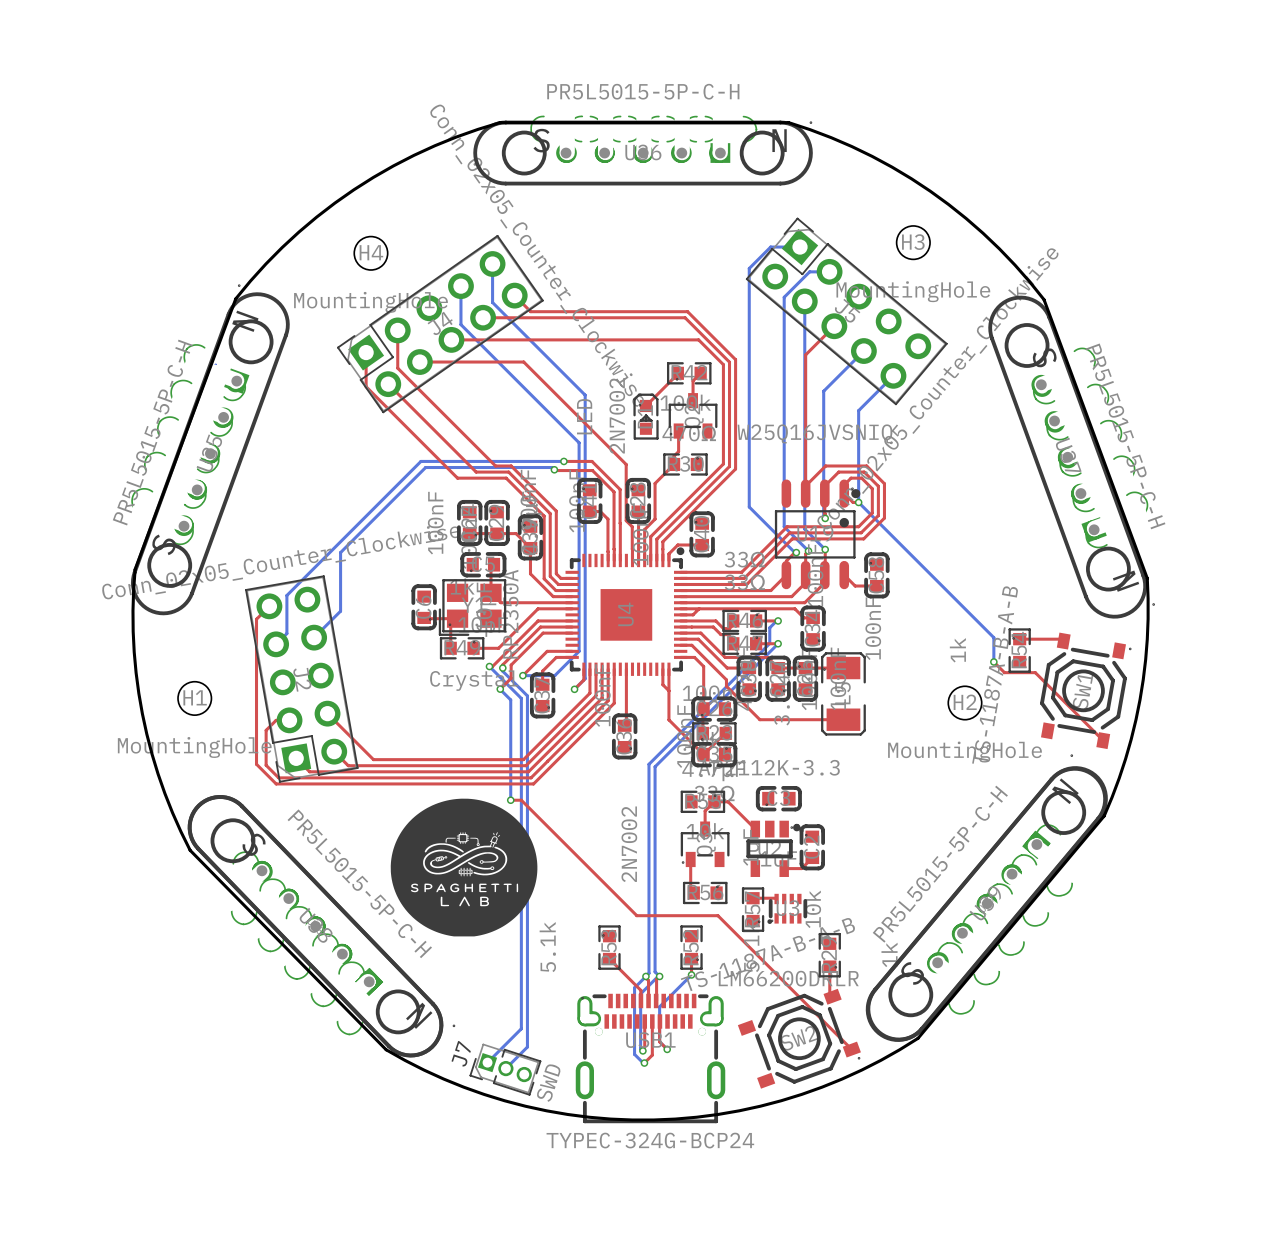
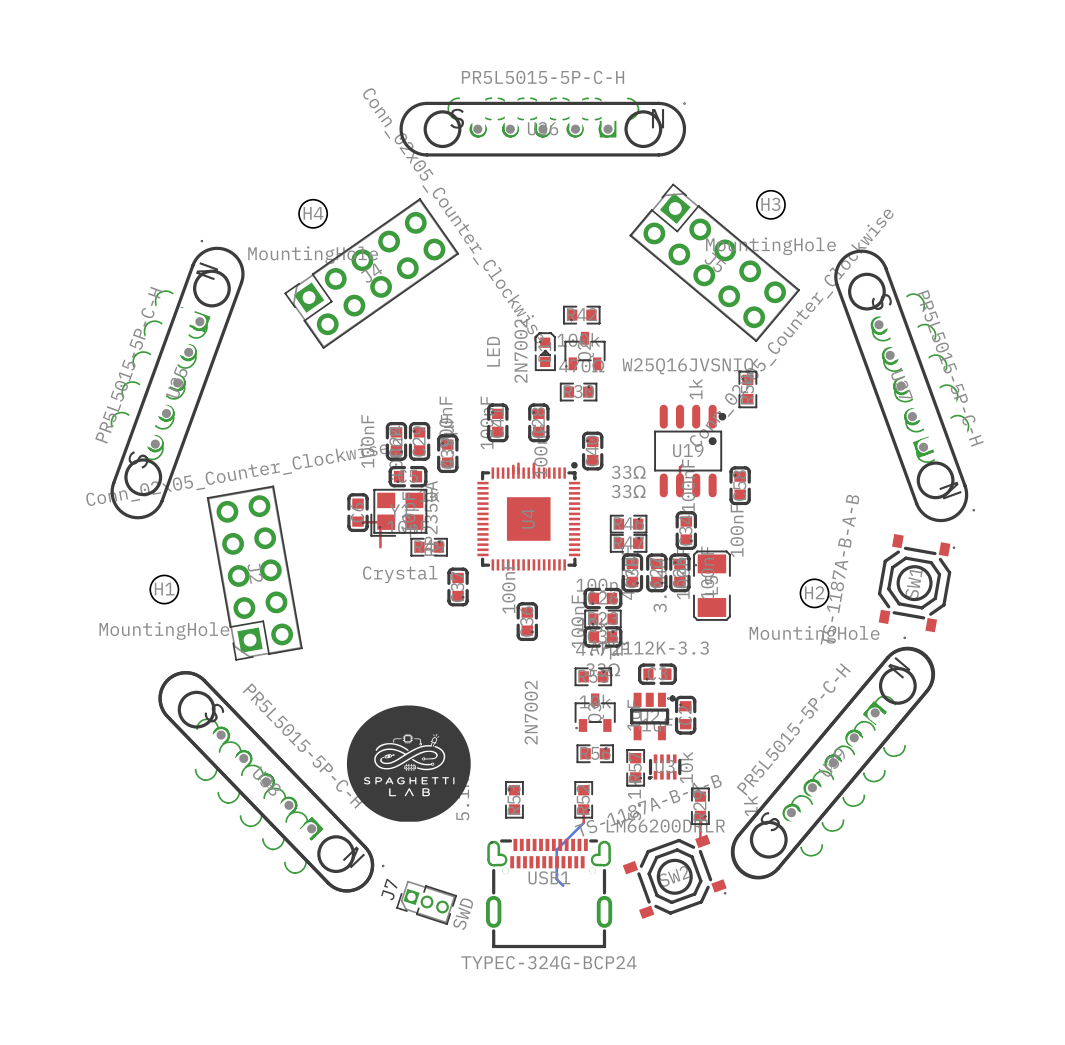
board edge: (500, 122) (788, 122) (831, 137) (872, 156) (930, 191) (983, 233) (1015, 265) (1044, 299) (1147, 578) (1147, 639) (1140, 699) (1125, 758) (1104, 816) (918, 1038) (861, 1070) (822, 1087) (781, 1100) (739, 1110) (696, 1117) (653, 1119) (589, 1117) (546, 1110) (484, 1094) (443, 1079) (404, 1060) (386, 1049) (190, 850) (164, 793) (152, 754) (142, 713) (136, 672) (133, 631) (135, 569) (235, 298) (265, 263) (299, 231) (353, 189) (393, 165) (434, 145) (500, 122) -> none
bottom track: (800, 247) (770, 247) (749, 268) (749, 507) (796, 552) -> none
bottom track: (492, 264) (492, 302) (585, 395) (585, 678) (574, 689) -> none
bottom track: (829, 271) (809, 271) (784, 297) (784, 526) (808, 551) -> none
bottom track: (460, 286) (460, 324) (579, 442) (579, 651) (554, 675) (522, 675) -> none
top track: (514, 295) (530, 311) (687, 311) (735, 359) (735, 469) (662, 541) (662, 560) -> none
bottom track: (804, 301) (804, 529) (825, 549) -> none
top track: (483, 317) (685, 317) (729, 362) (729, 466) (656, 539) (656, 560) -> none
top track: (834, 326) (805, 354) (805, 499) -> none
top track: (397, 330) (397, 368) (495, 465) (511, 465) (556, 511) (556, 573) (560, 578) (572, 578) -> none
top track: (451, 339) (698, 339) (723, 364) (723, 463) (650, 536) (650, 560) -> none
bottom track: (863, 351) (823, 391) (823, 516) (825, 518) -> none
top track: (366, 352) (366, 386) (457, 478) (506, 478) (544, 516) (544, 578) (555, 590) (572, 590) -> none
top track: (419, 362) (523, 362) (626, 464) (626, 520) (632, 526) (632, 549) -> none
top track: (677, 373) (645, 405) -> none
top track: (700, 373) (693, 380) (693, 400) -> none
bottom track: (893, 375) (858, 410) (858, 502) (993, 637) (993, 661) -> none
top track: (388, 384) (476, 472) (508, 472) (550, 513) (550, 576) (558, 584) (572, 584) -> none
top track: (681, 434) (678, 431) (678, 451) (674, 456) (674, 464) (655, 483) (655, 519) (644, 529) (644, 560) -> none
top track: (563, 461) (592, 461) (620, 489) (620, 523) -> none
bottom track: (563, 461) (420, 461) (286, 595) (286, 633) (276, 644) -> none
via: (563, 461) -> none
top track: (554, 469) (592, 470) (614, 492) (614, 549) -> none
bottom track: (554, 469) (552, 467) (425, 467) (340, 552) (340, 611) (314, 637) -> none
via: (554, 469) -> none
top track: (805, 486) (825, 465) (866, 465) (884, 483) (884, 518) (863, 538) (792, 538) (746, 584) (680, 584) -> none
top track: (858, 502) (853, 502) (844, 493) (844, 484) (851, 478) (861, 478) (872, 488) (872, 513) (858, 526) (787, 526) (741, 572) (680, 572) -> none
via: (858, 502) -> none
top track: (594, 511) (600, 511) (607, 519) (607, 551) -> none
top track: (638, 511) (638, 560) -> none
top track: (825, 518) (824, 486) (838, 472) (864, 472) (878, 486) (878, 515) (861, 532) (789, 532) (744, 578) (680, 578) -> none
via: (825, 518) -> none
top track: (620, 523) (620, 560) -> none
top track: (469, 533) (516, 533) (530, 548) (530, 573) (553, 596) (572, 596) -> none
top track: (702, 544) (677, 544) (668, 553) (668, 560) -> none
top track: (825, 549) (824, 582) (804, 602) (680, 602) -> none
via: (825, 549) -> none
via: (808, 551) -> none
top track: (796, 552) (786, 561) (786, 575) (770, 590) (680, 590) -> none
via: (796, 552) -> none
top track: (494, 564) (490, 567) (490, 592) (500, 602) (572, 602) -> none
top track: (844, 575) (855, 586) (876, 586) -> none
top track: (805, 582) (791, 596) (680, 596) -> none
top track: (269, 606) (256, 619) (256, 764) (276, 783) (533, 783) (614, 703) (614, 669) -> none
top track: (572, 608) (538, 608) (498, 648) (473, 648) -> none
top track: (680, 608) (794, 608) (803, 617) (813, 617) -> none
top track: (699, 608) (693, 614) (680, 614) -> none
top track: (572, 620) (538, 620) (492, 666) (489, 666) -> none
top track: (680, 620) (715, 620) (723, 628) (729, 628) (733, 624) (733, 620) (731, 622) -> none
top track: (756, 620) (778, 620) -> none
bottom track: (778, 620) (769, 627) (769, 643) (648, 764) (648, 973) (634, 987) (634, 1054) (644, 1063) -> none
via: (778, 620) -> none
top track: (572, 627) (540, 627) (502, 664) (502, 668) -> none
top track: (680, 627) (713, 627) (720, 634) (727, 634) (733, 639) (733, 643) -> none
top track: (572, 633) (543, 633) (511, 665) (511, 678) (500, 689) -> none
top track: (680, 633) (700, 633) (725, 657) (767, 657) (778, 668) (843, 668) -> none
top track: (680, 639) (698, 639) (727, 668) (749, 668) -> none
top track: (1019, 639) (1061, 639) (1063, 641) -> none
top track: (756, 643) (778, 643) -> none
bottom track: (778, 643) (655, 766) (655, 971) (659, 976) (640, 993) (640, 1048) (642, 1050) -> none
via: (778, 643) -> none
top track: (680, 645) (691, 645) (726, 679) (726, 686) (759, 719) (843, 719) -> none
part position: (462, 648) -> (429, 547)
part position: (1019, 650) -> (747, 389)
top track: (572, 651) (547, 651) (522, 675) -> none
top track: (572, 657) (556, 657) (542, 671) (542, 684) -> none
top track: (680, 657) (694, 657) (703, 666) (702, 733) -> none
top track: (993, 661) (1004, 672) (1035, 672) (1103, 740) -> none
via: (993, 661) -> none
bottom track: (489, 666) (521, 698) (521, 1028) (487, 1062) -> none
via: (489, 666) -> none
bottom track: (502, 668) (502, 671) (527, 695) (527, 1047) (505, 1068) -> none
via: (502, 668) -> none
top track: (583, 669) (583, 679) (574, 689) -> none
top track: (589, 669) (589, 693) (523, 759) (373, 759) (327, 713) -> none
top track: (596, 669) (596, 695) (526, 765) (348, 765) (334, 751) -> none
top track: (602, 669) (602, 698) (528, 771) (309, 771) (296, 758) -> none
top track: (608, 669) (608, 700) (531, 777) (278, 777) (266, 765) (266, 730) (276, 720) (289, 720) -> none
top track: (626, 669) (626, 724) (624, 725) -> none
top track: (662, 669) (662, 684) (668, 690) -> none
top track: (668, 669) (668, 719) (703, 754) (725, 733) -> none
via: (522, 675) -> none
bottom track: (500, 689) (510, 699) (510, 800) -> none
via: (500, 689) -> none
via: (574, 689) -> none
top track: (510, 800) (521, 800) (636, 915) (717, 915) (851, 1049) -> none
via: (510, 800) -> none
top track: (705, 829) (705, 811) (714, 801) (728, 801) (755, 829) -> none
drawing position: (463, 838) -> (407, 738)
drawing position: (494, 839) -> (434, 740)
drawing position: (478, 844) -> (420, 744)
top track: (812, 857) (801, 868) (784, 868) -> none
drawing position: (442, 858) -> (390, 755)
drawing position: (437, 859) -> (386, 756)
drawing position: (438, 859) -> (387, 756)
top track: (690, 859) (690, 889) (693, 892) -> none
drawing: [480, 861, 494, 870] -> none
drawing position: (464, 867) -> (408, 763)
drawing position: (465, 871) -> (410, 767)
drawing position: (428, 886) -> (378, 779)
drawing position: (441, 887) -> (389, 780)
drawing: none -> [422, 758, 434, 765]
top track: (753, 898) (776, 898) -> none
drawing position: (484, 899) -> (425, 790)
drawing position: (484, 903) -> (426, 793)
top track: (609, 958) (640, 990) (640, 1000) -> none
via: (691, 974) -> none
top track: (645, 976) (648, 980) (648, 1000) -> none
via: (645, 976) -> none
top track: (659, 976) (656, 979) (656, 1000) -> none
via: (659, 976) -> none
top track: (644, 1021) (644, 1047) -> none
top track: (652, 1021) (652, 1055) (644, 1063) -> none
top track: (659, 1021) (659, 1041) (667, 1049) -> none
via: (667, 1049) -> none
via: (642, 1050) -> none
via: (644, 1063) -> none

